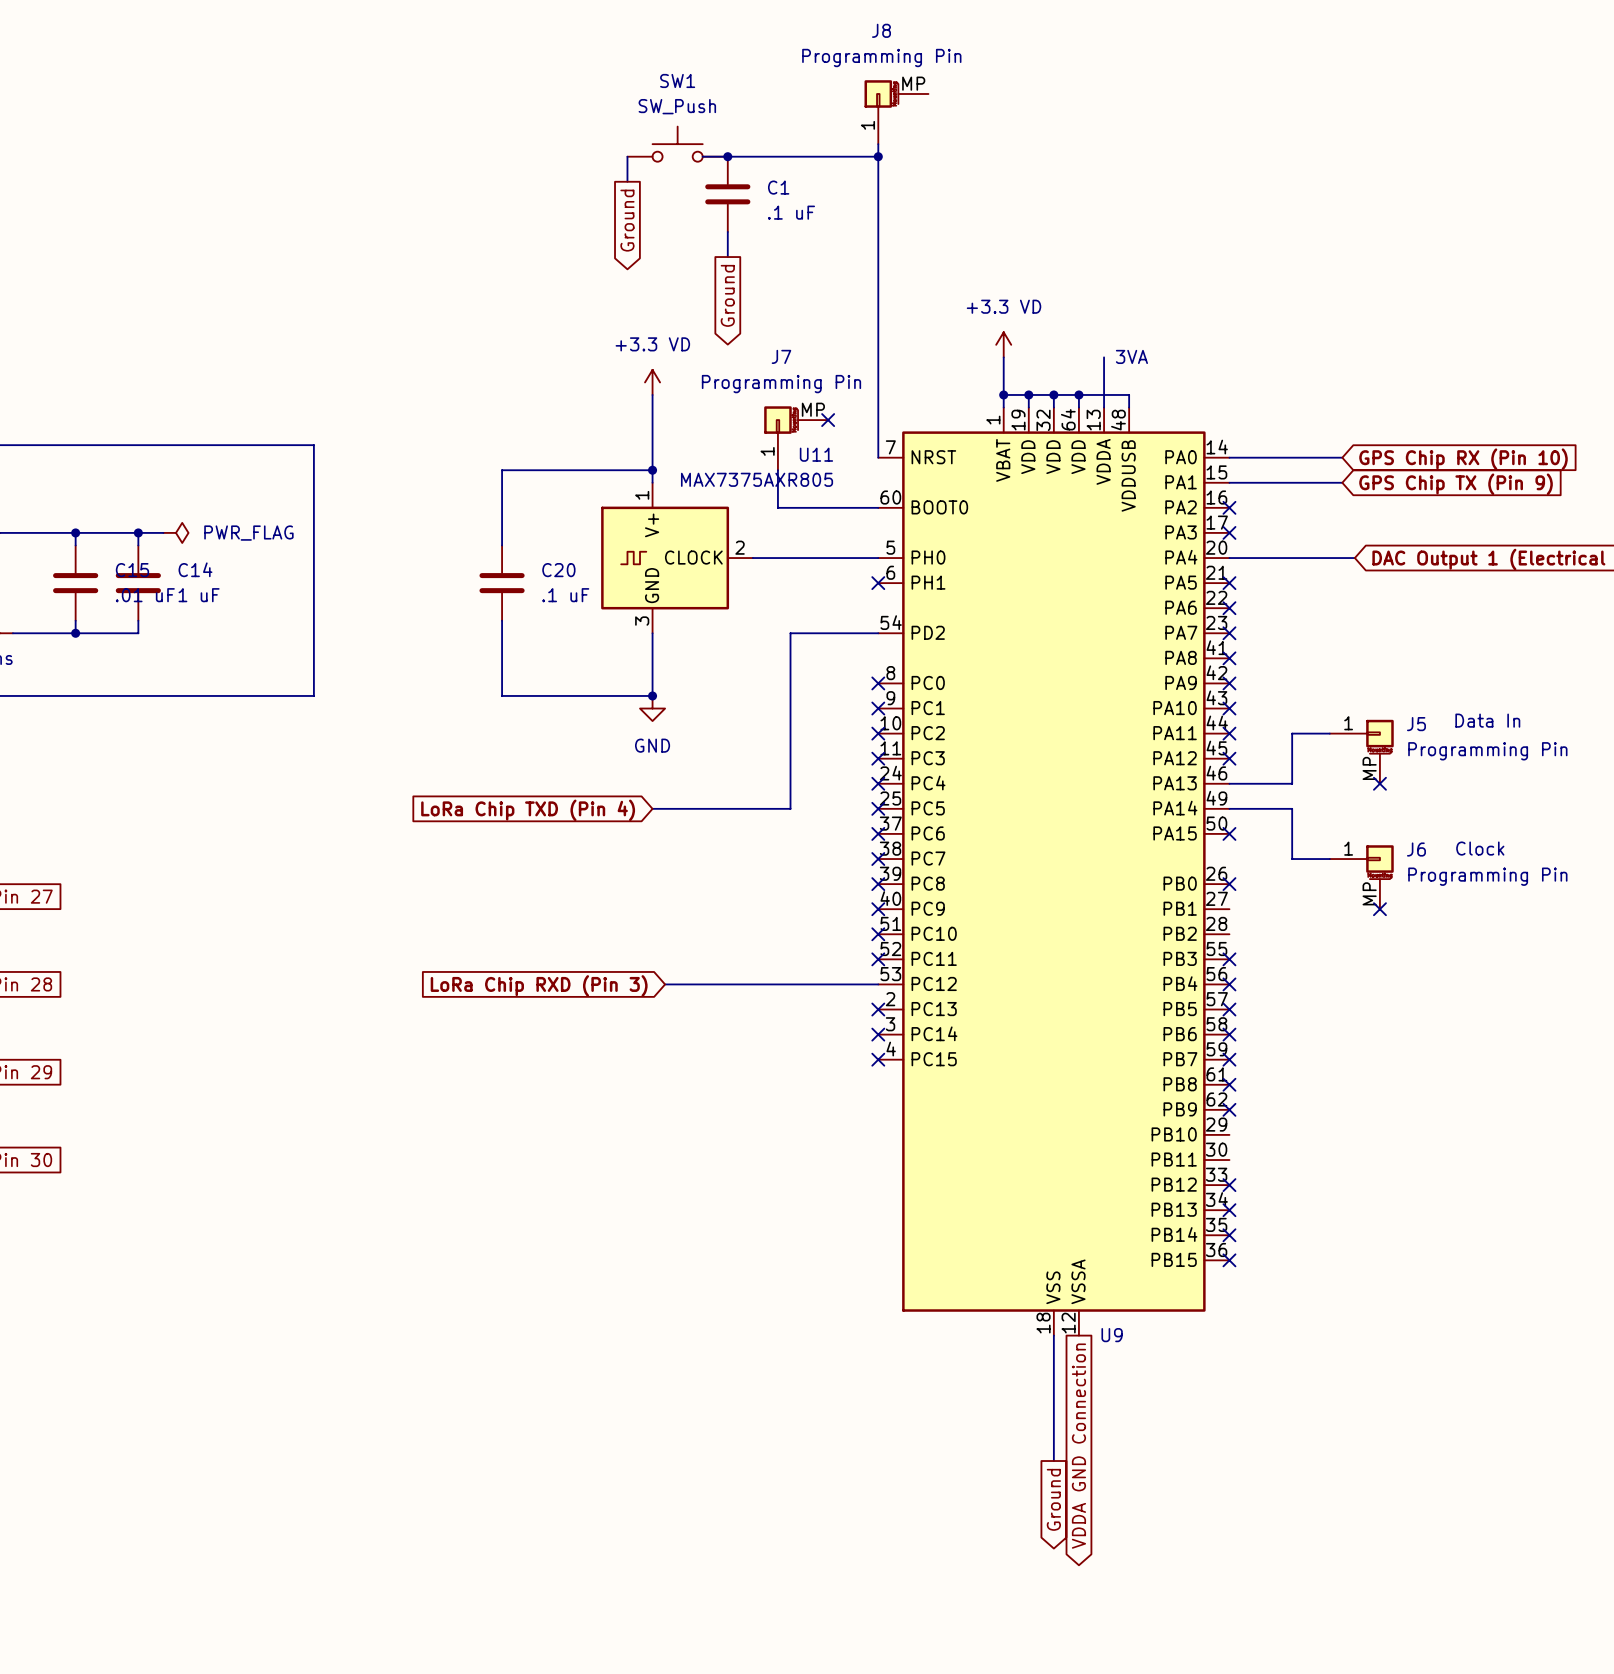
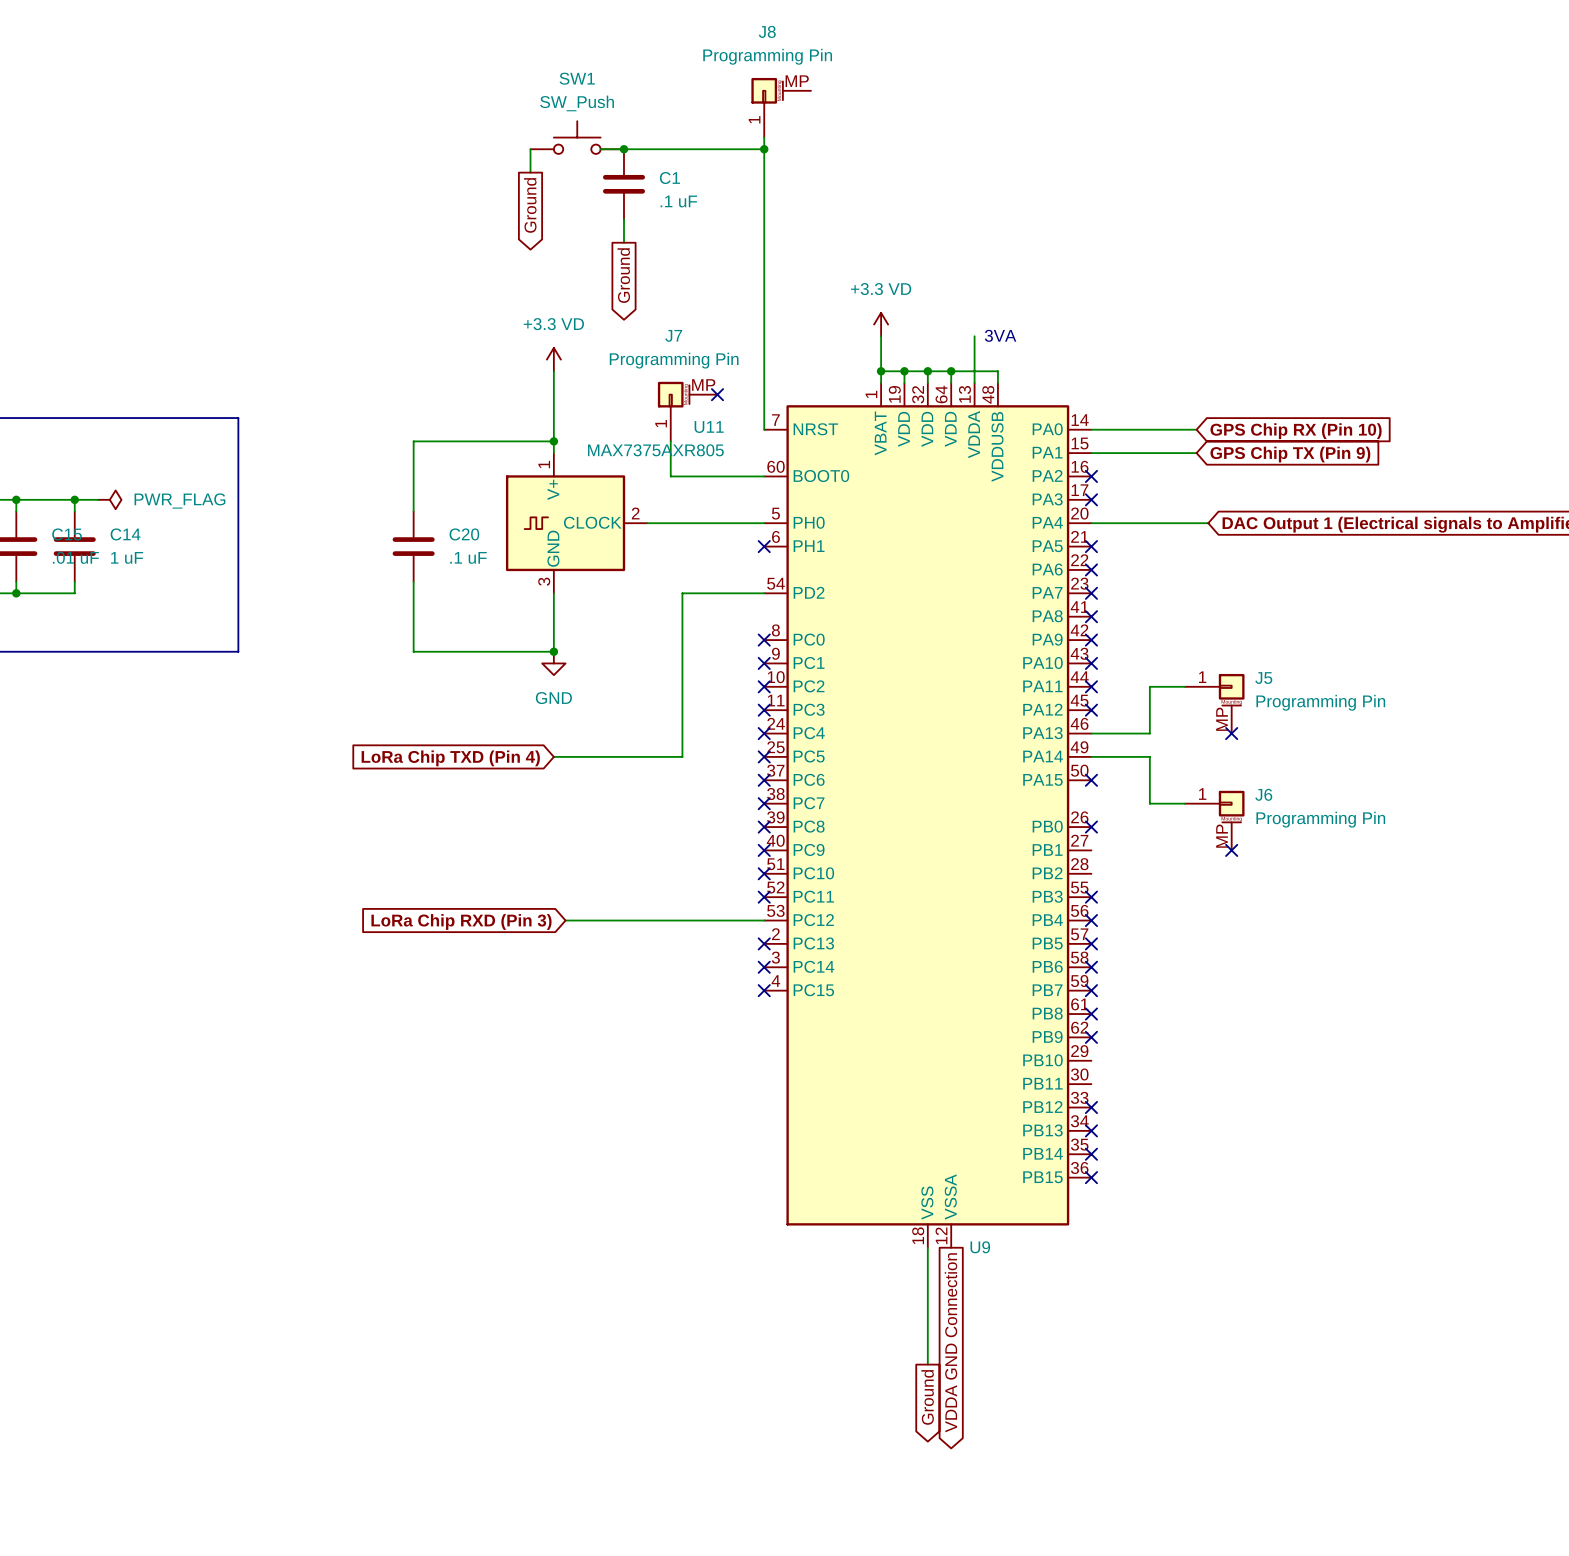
text: Data In (1487, 720) -> none
text: Clock (1480, 848) -> none

